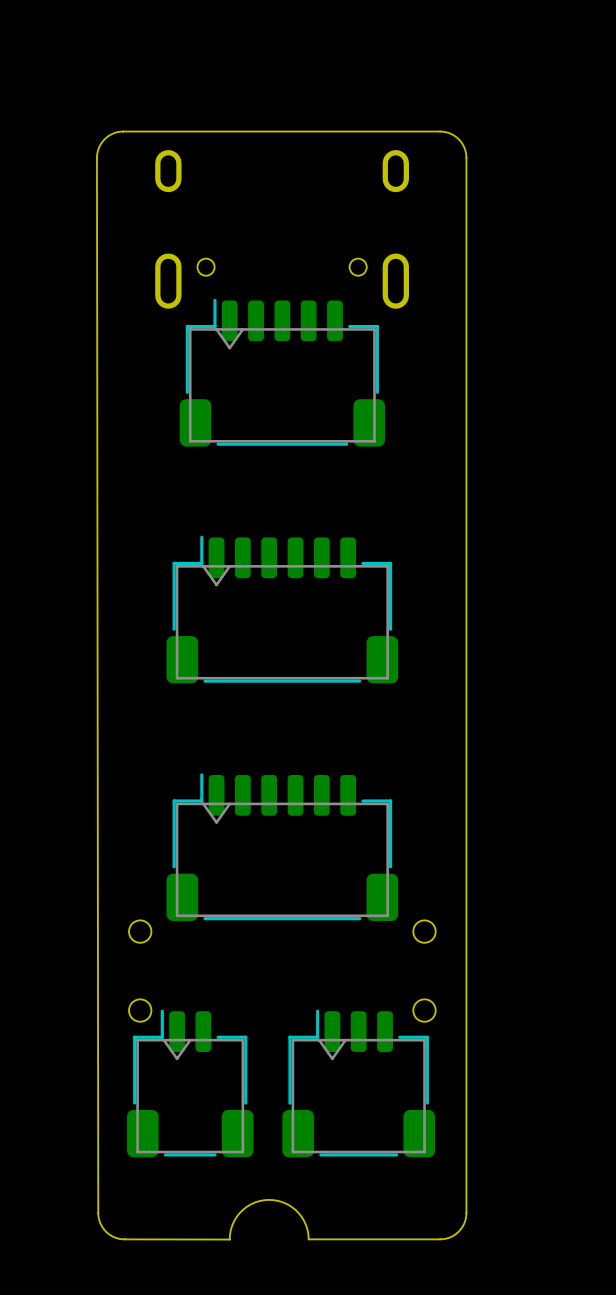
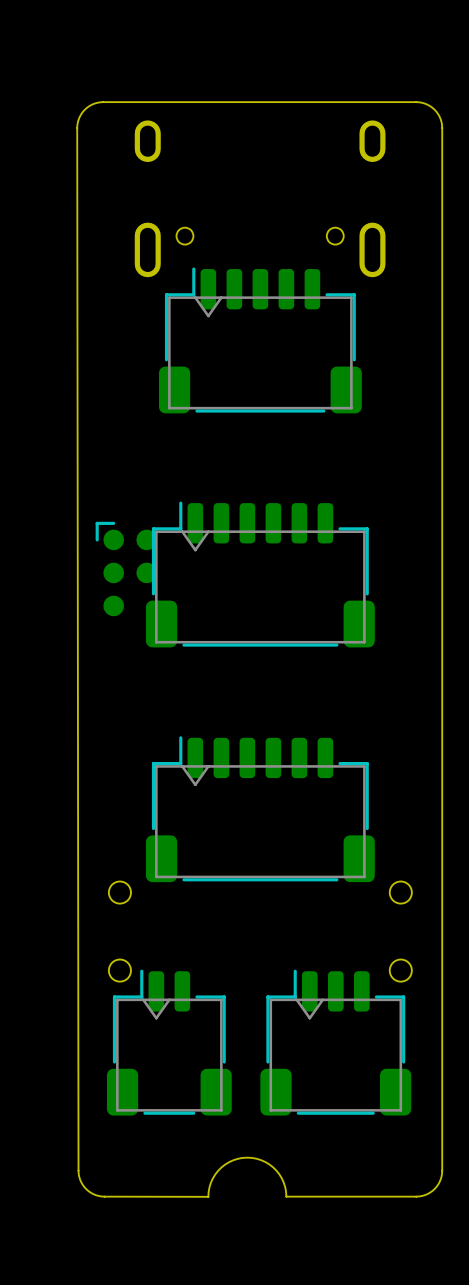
part: none -> (126, 569)

